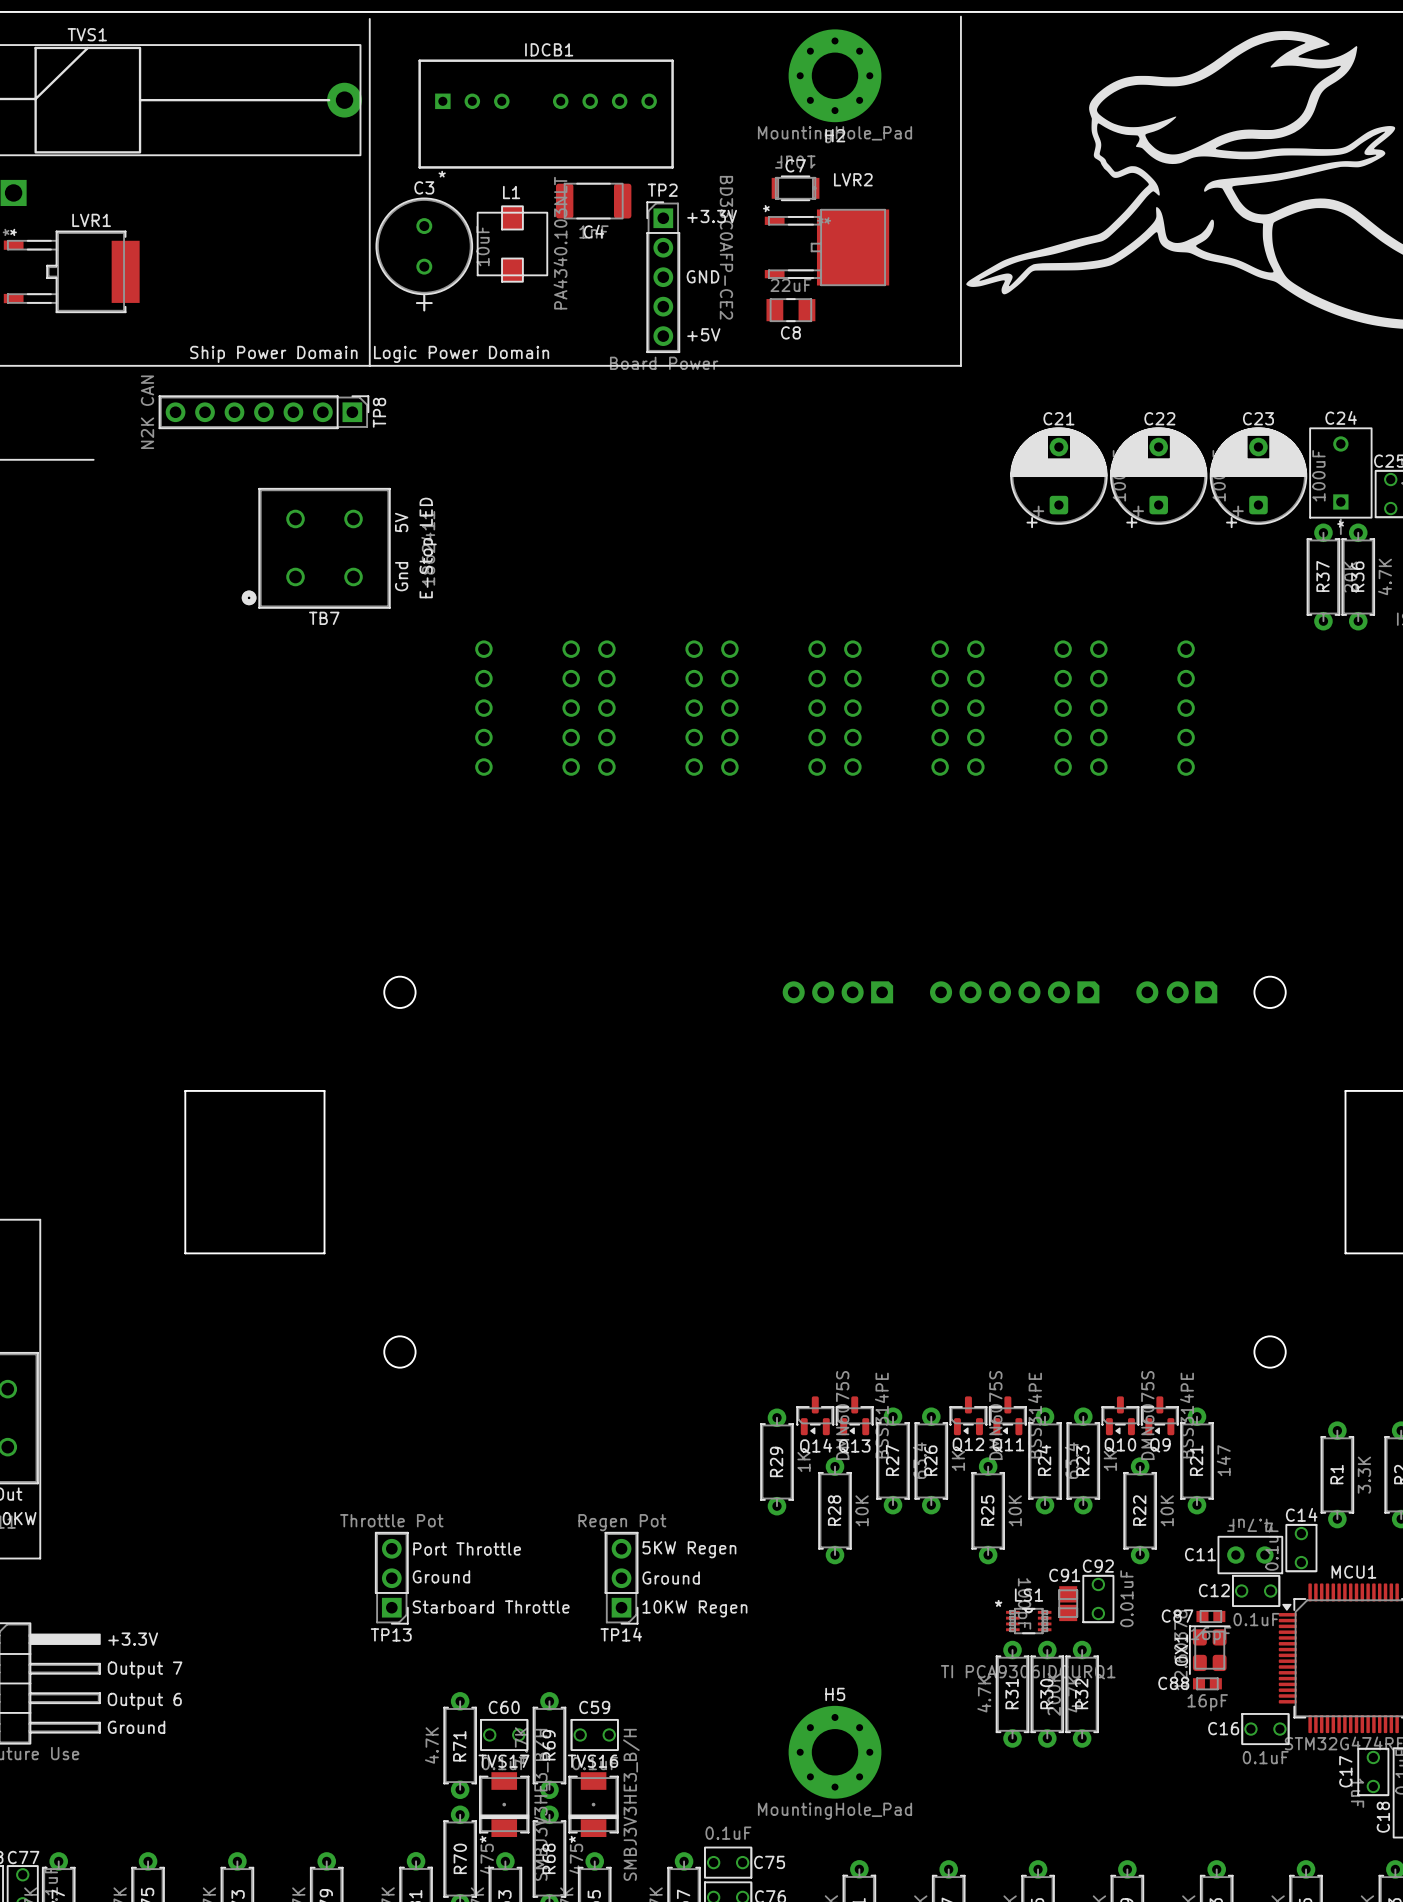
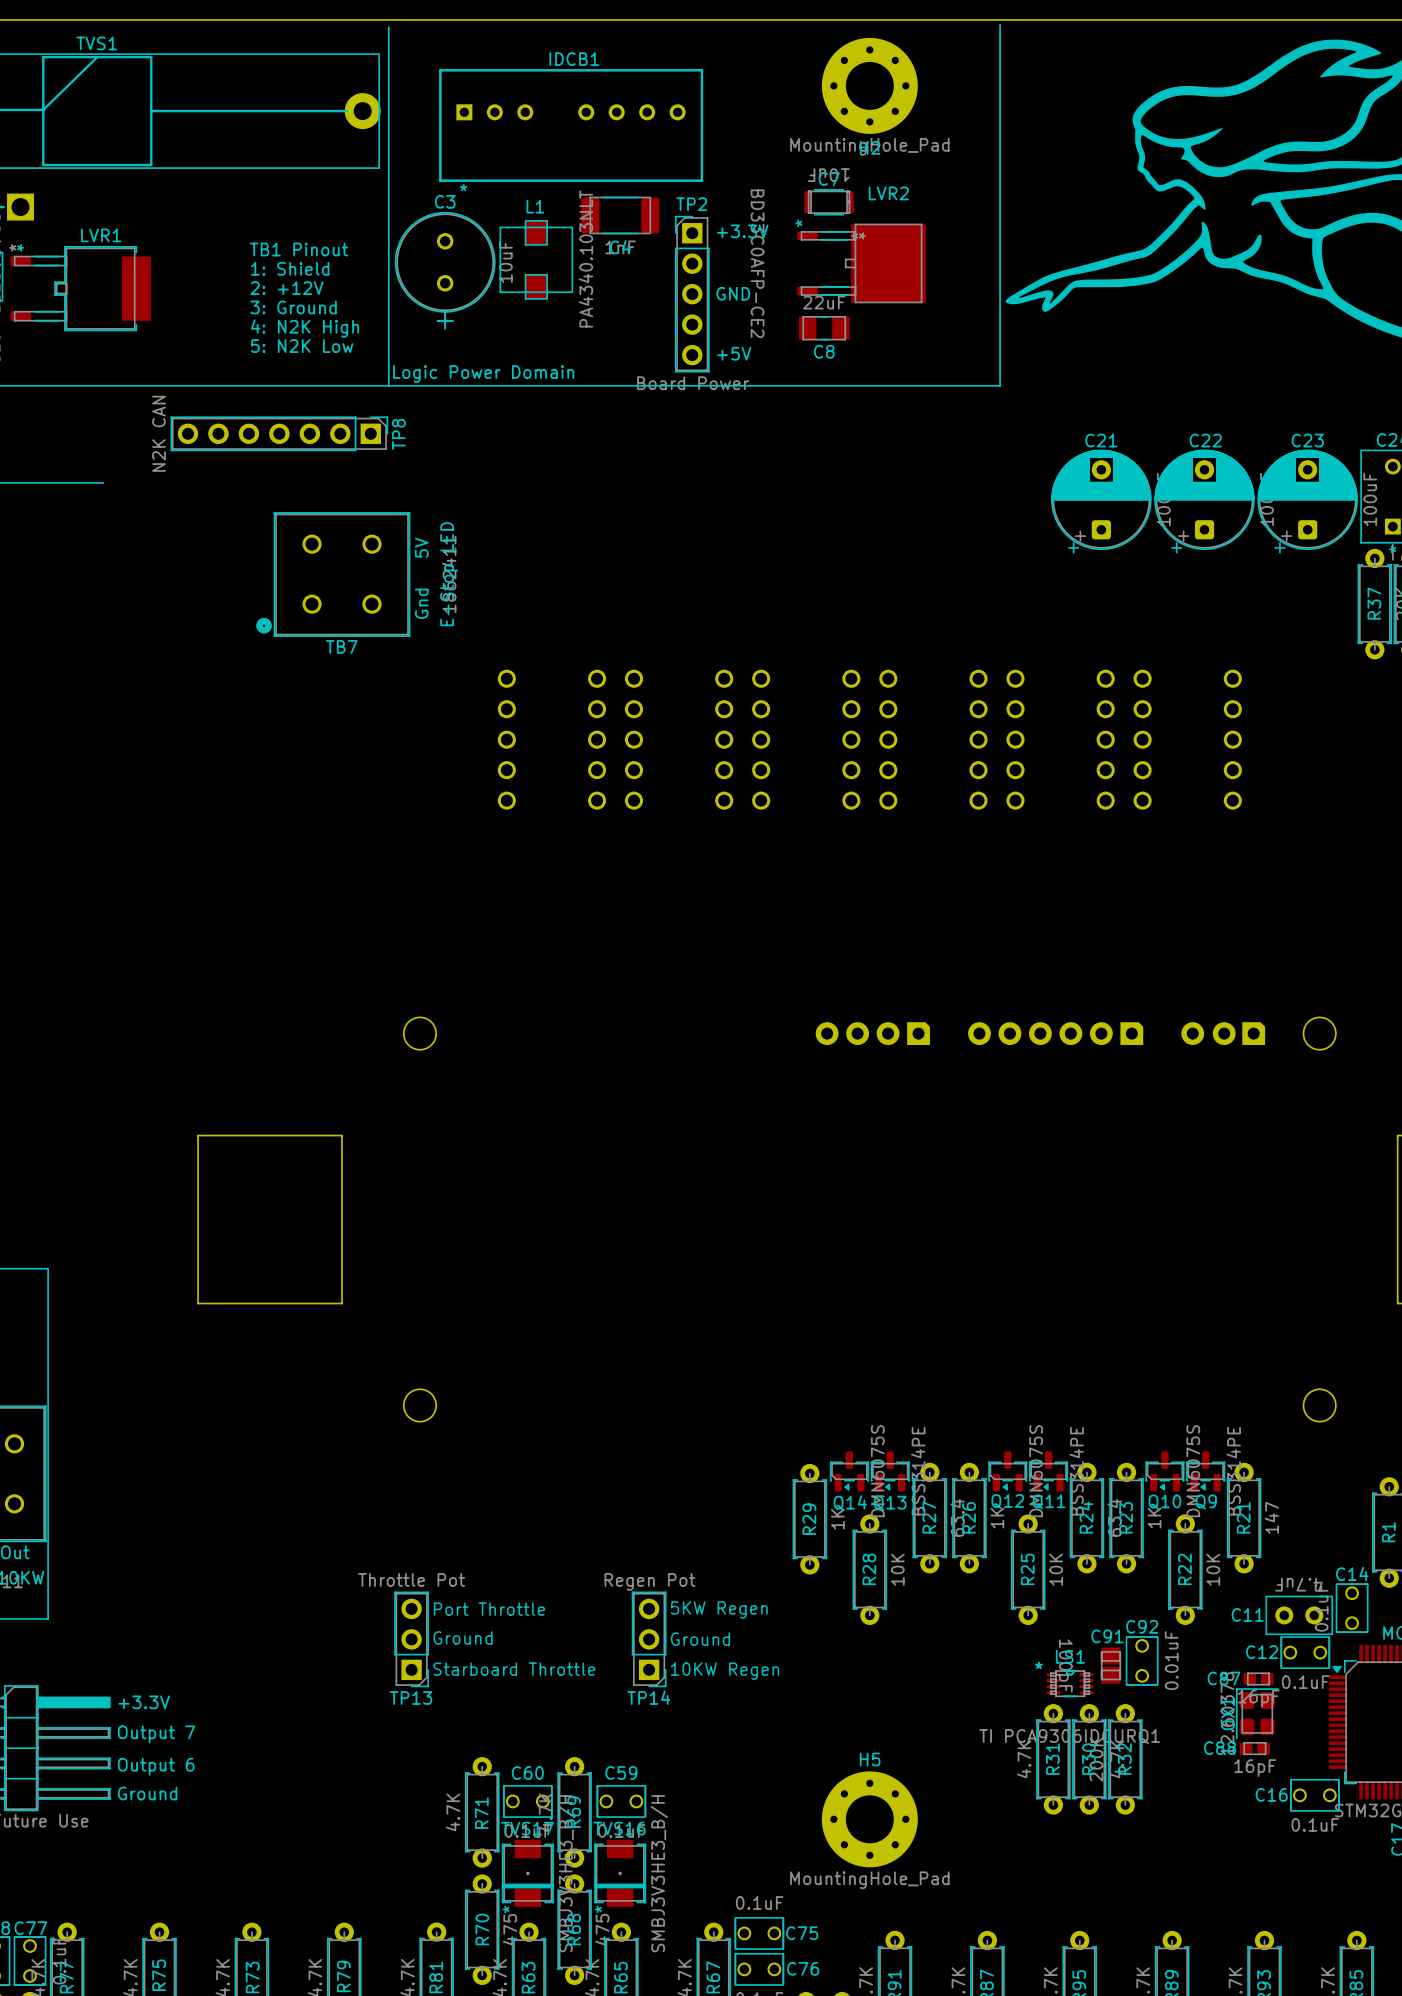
text: none -> TB1 Pinout (299, 249)
text: none -> 1: Shield (290, 268)
text: none -> 2: +12V (287, 288)
text: none -> 3: Ground (293, 307)
text: none -> 4: N2K High (305, 328)
text: none -> 5: N2K Low (302, 346)
text: Ship Power Domain (273, 354) -> none

